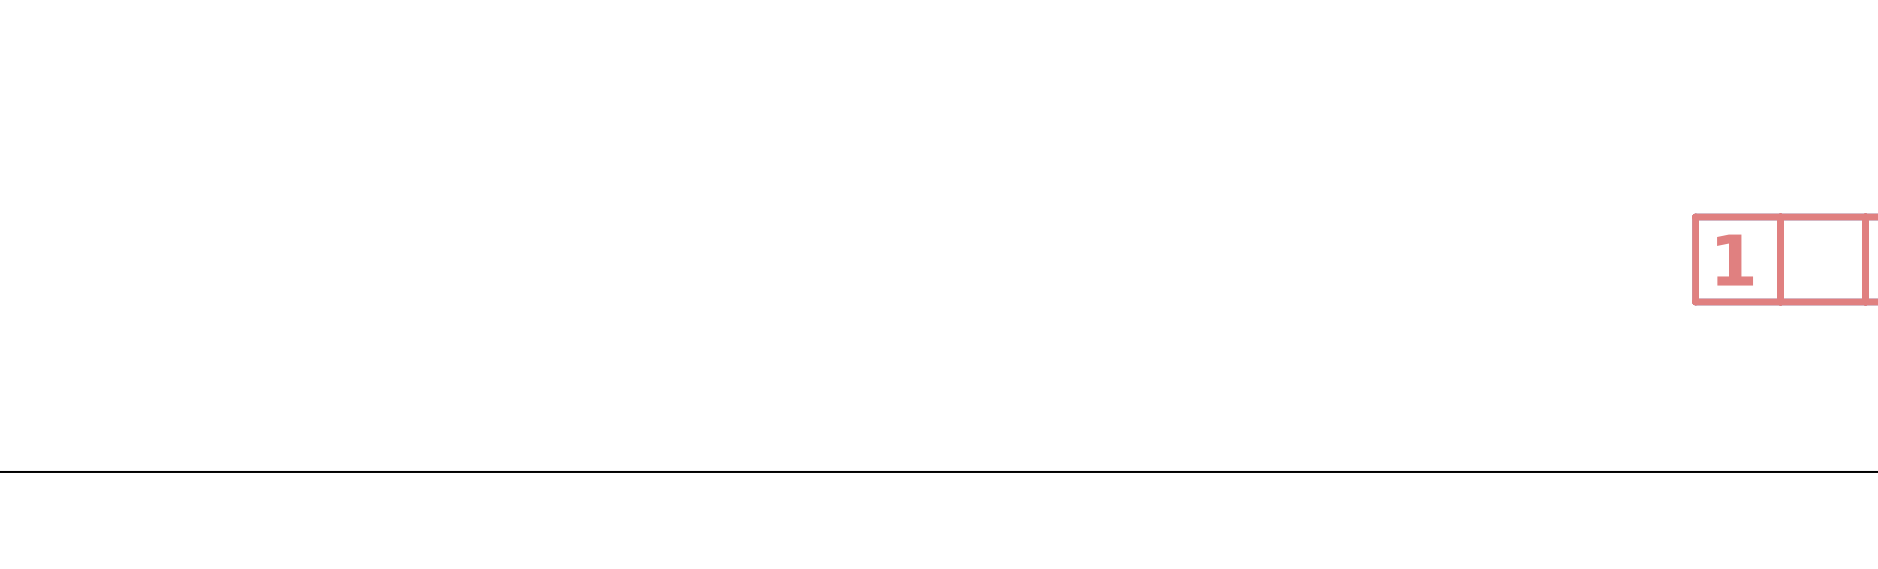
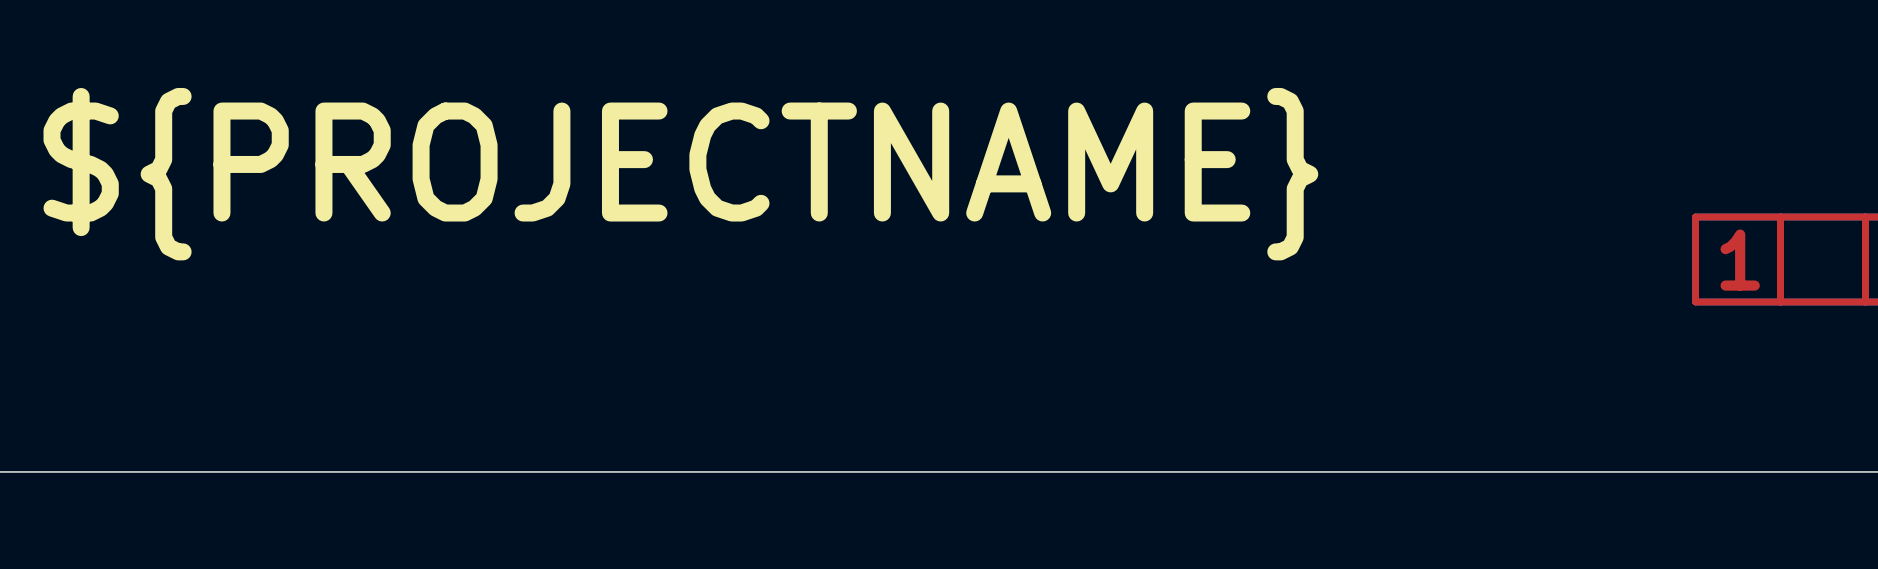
text: none -> ${PROJECTNAME} (680, 174)

